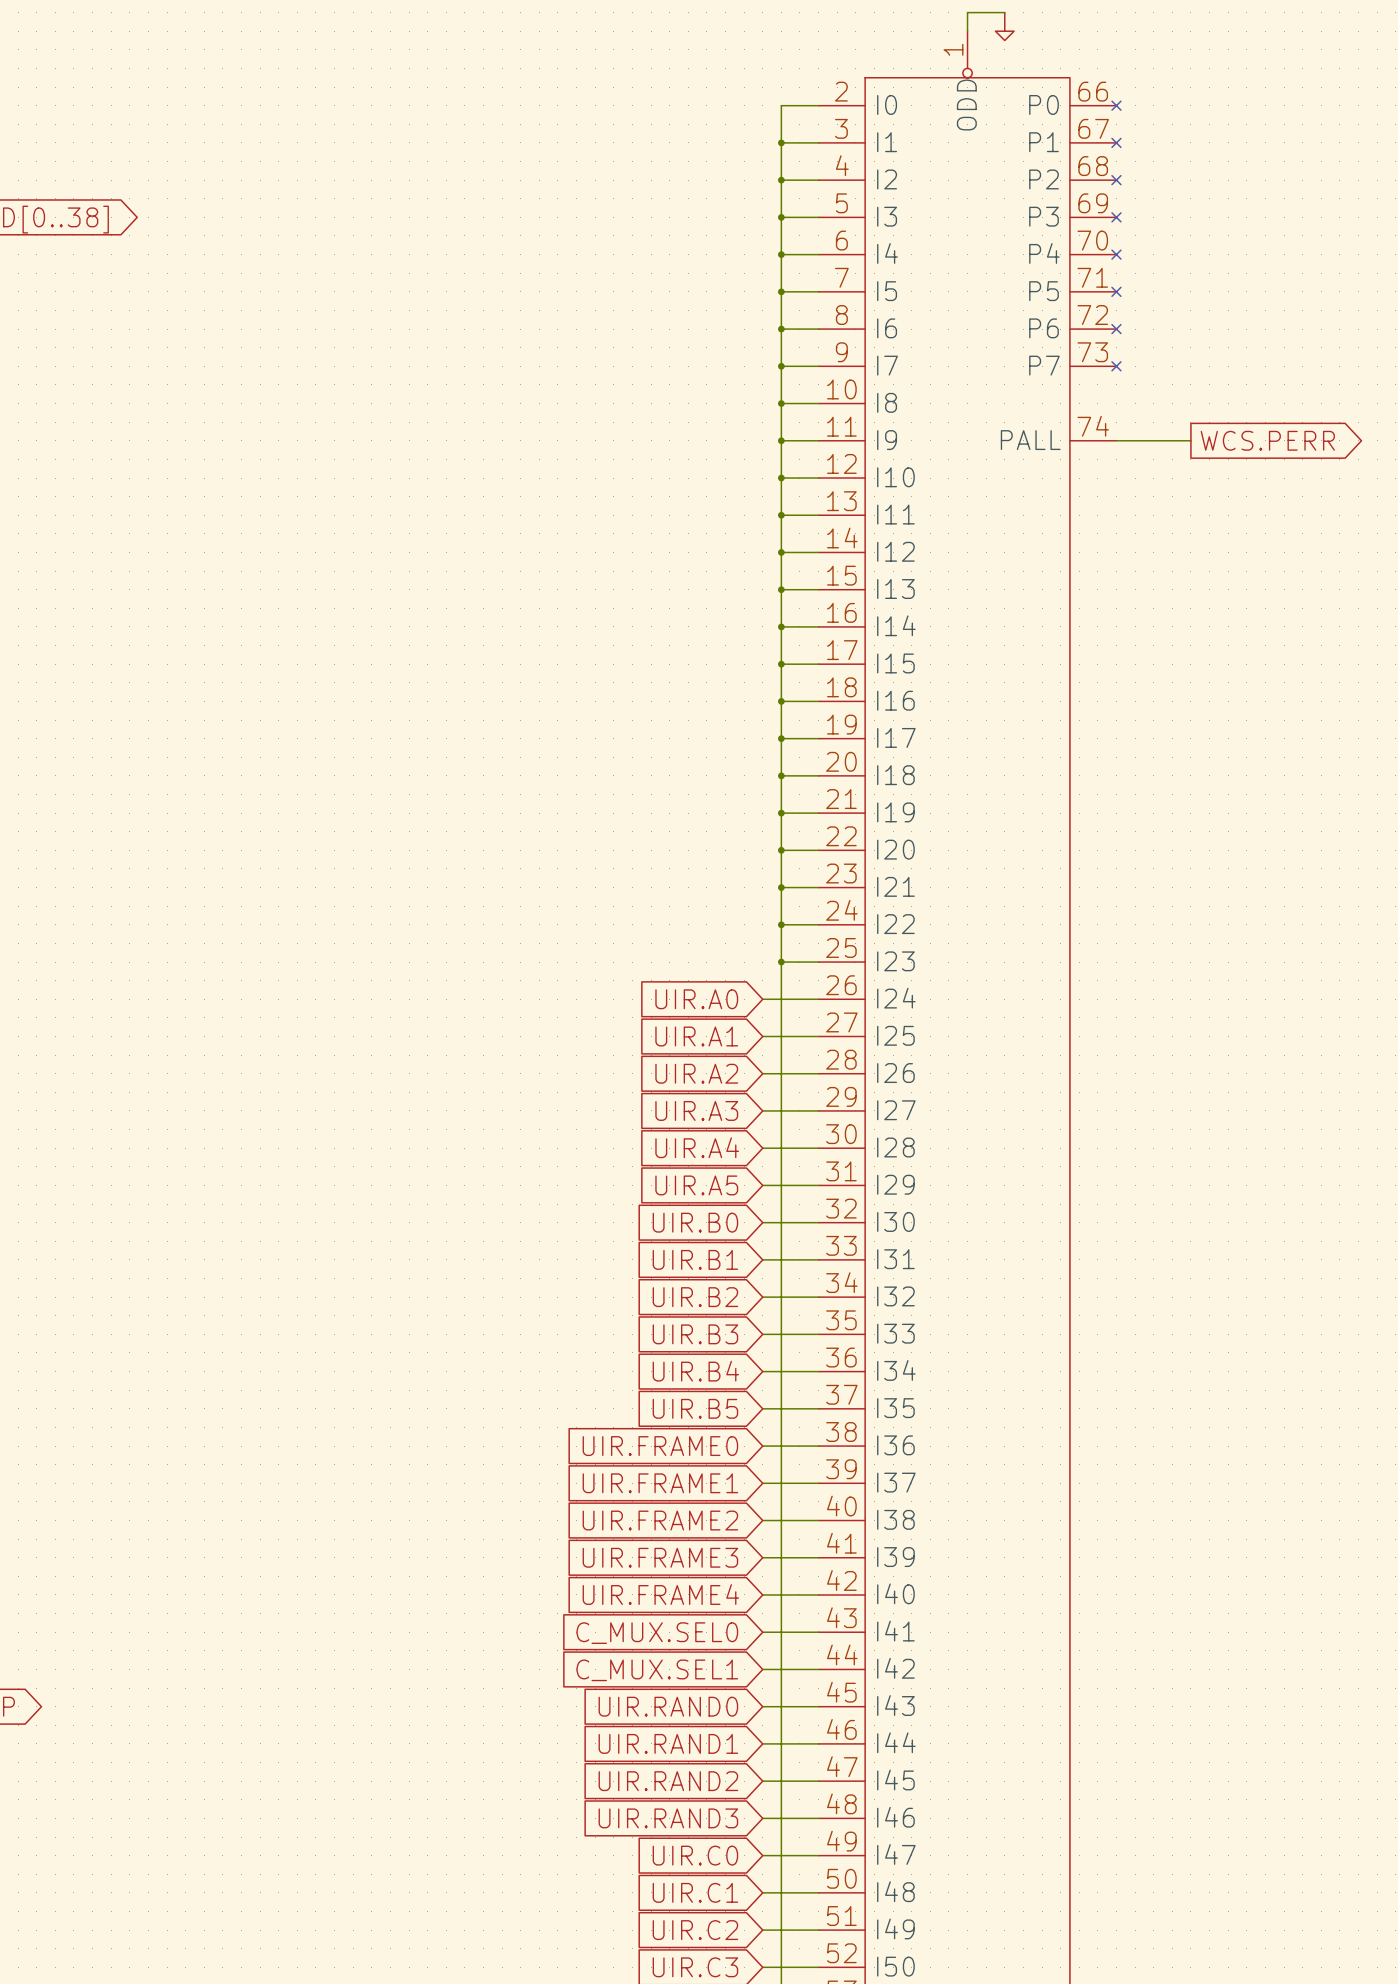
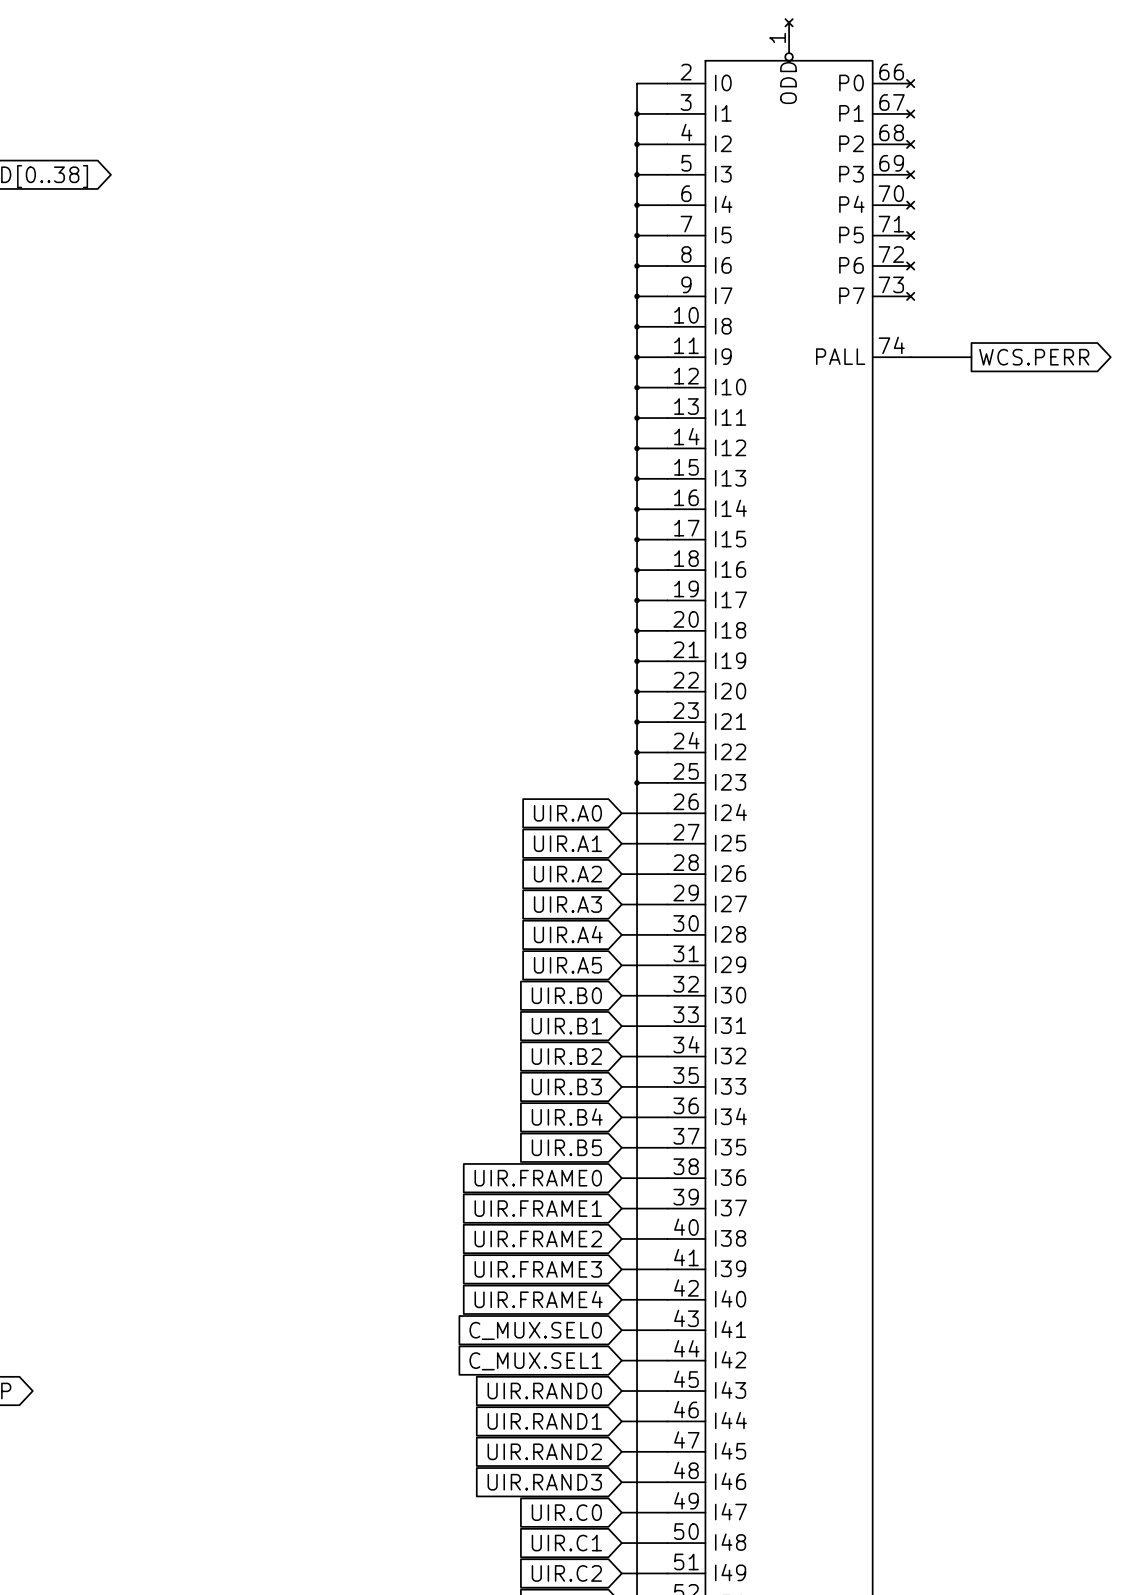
wire: (1004, 12) (967, 12) (967, 31) -> none
power symbol: (1004, 26) -> none
no-connect mark: none -> (789, 22)

